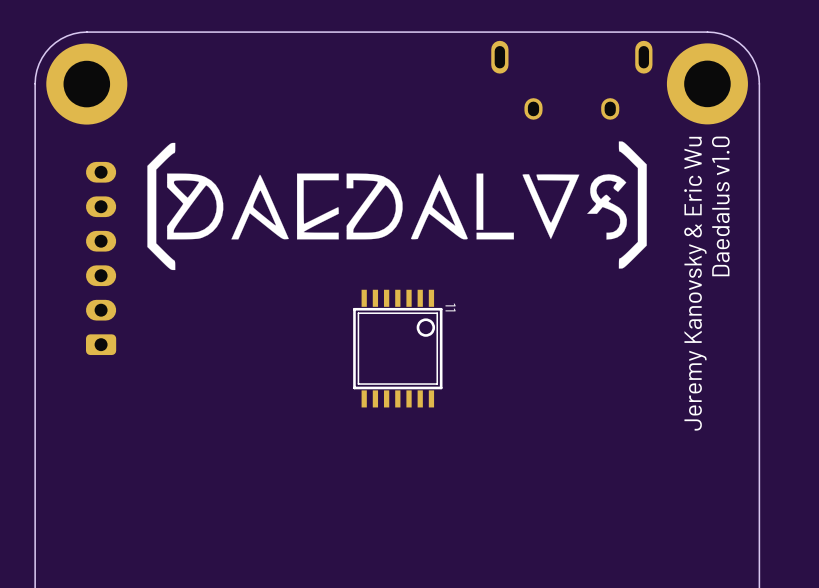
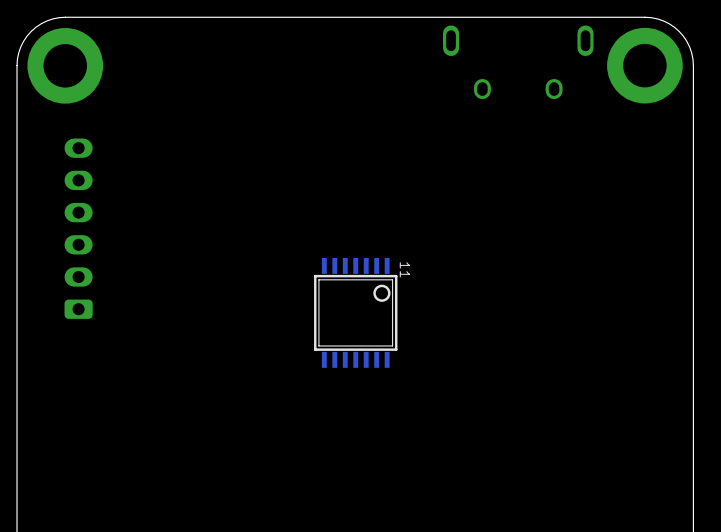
drawing: [147, 141, 647, 271] -> none
text: Daedalus v1.0 (720, 206) -> none
text: Jeremy Kanovsky & Eric Wu (695, 283) -> none

